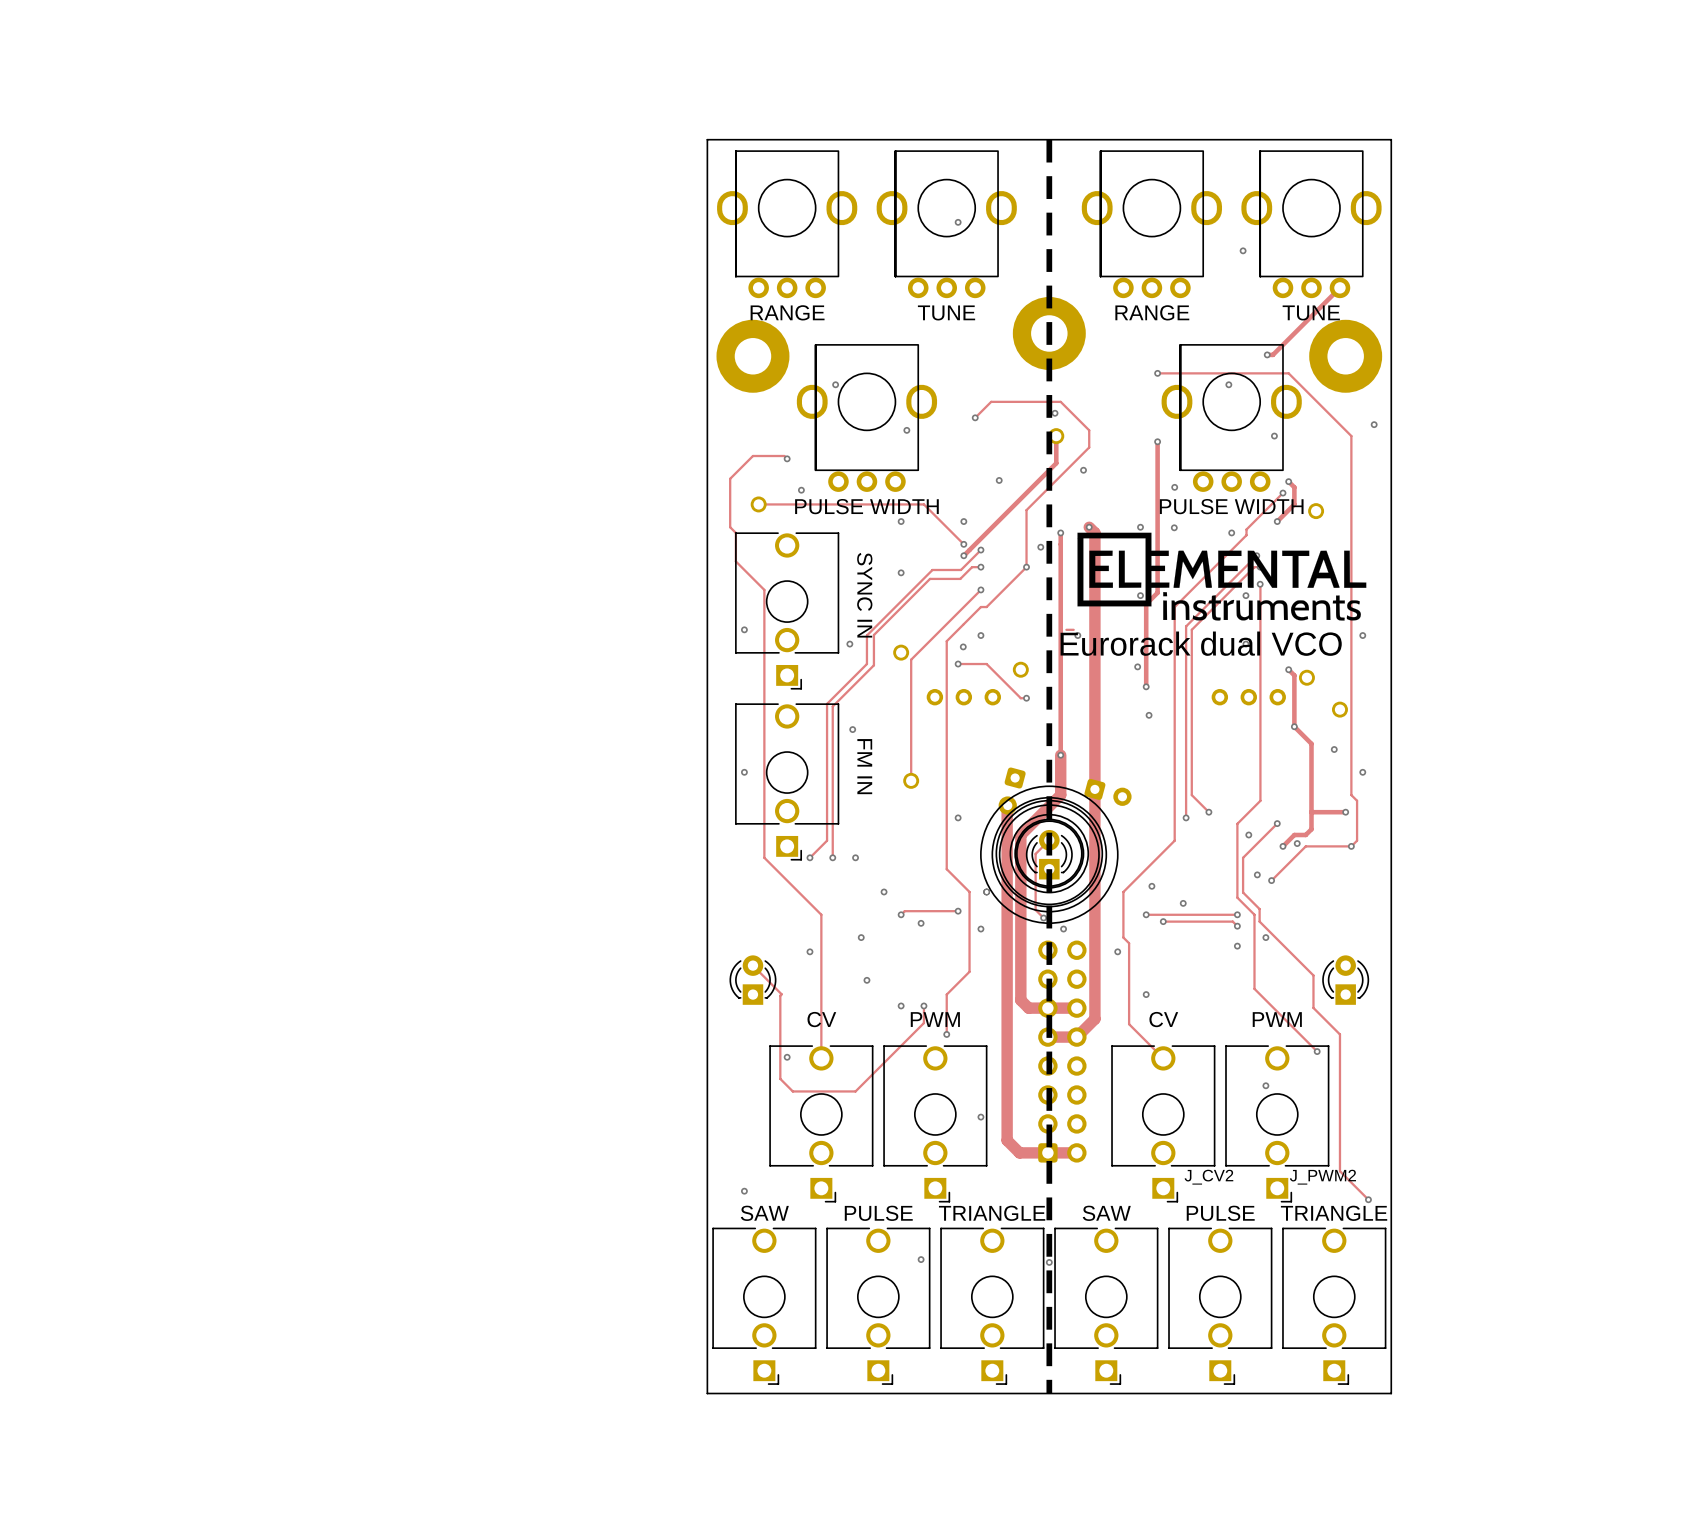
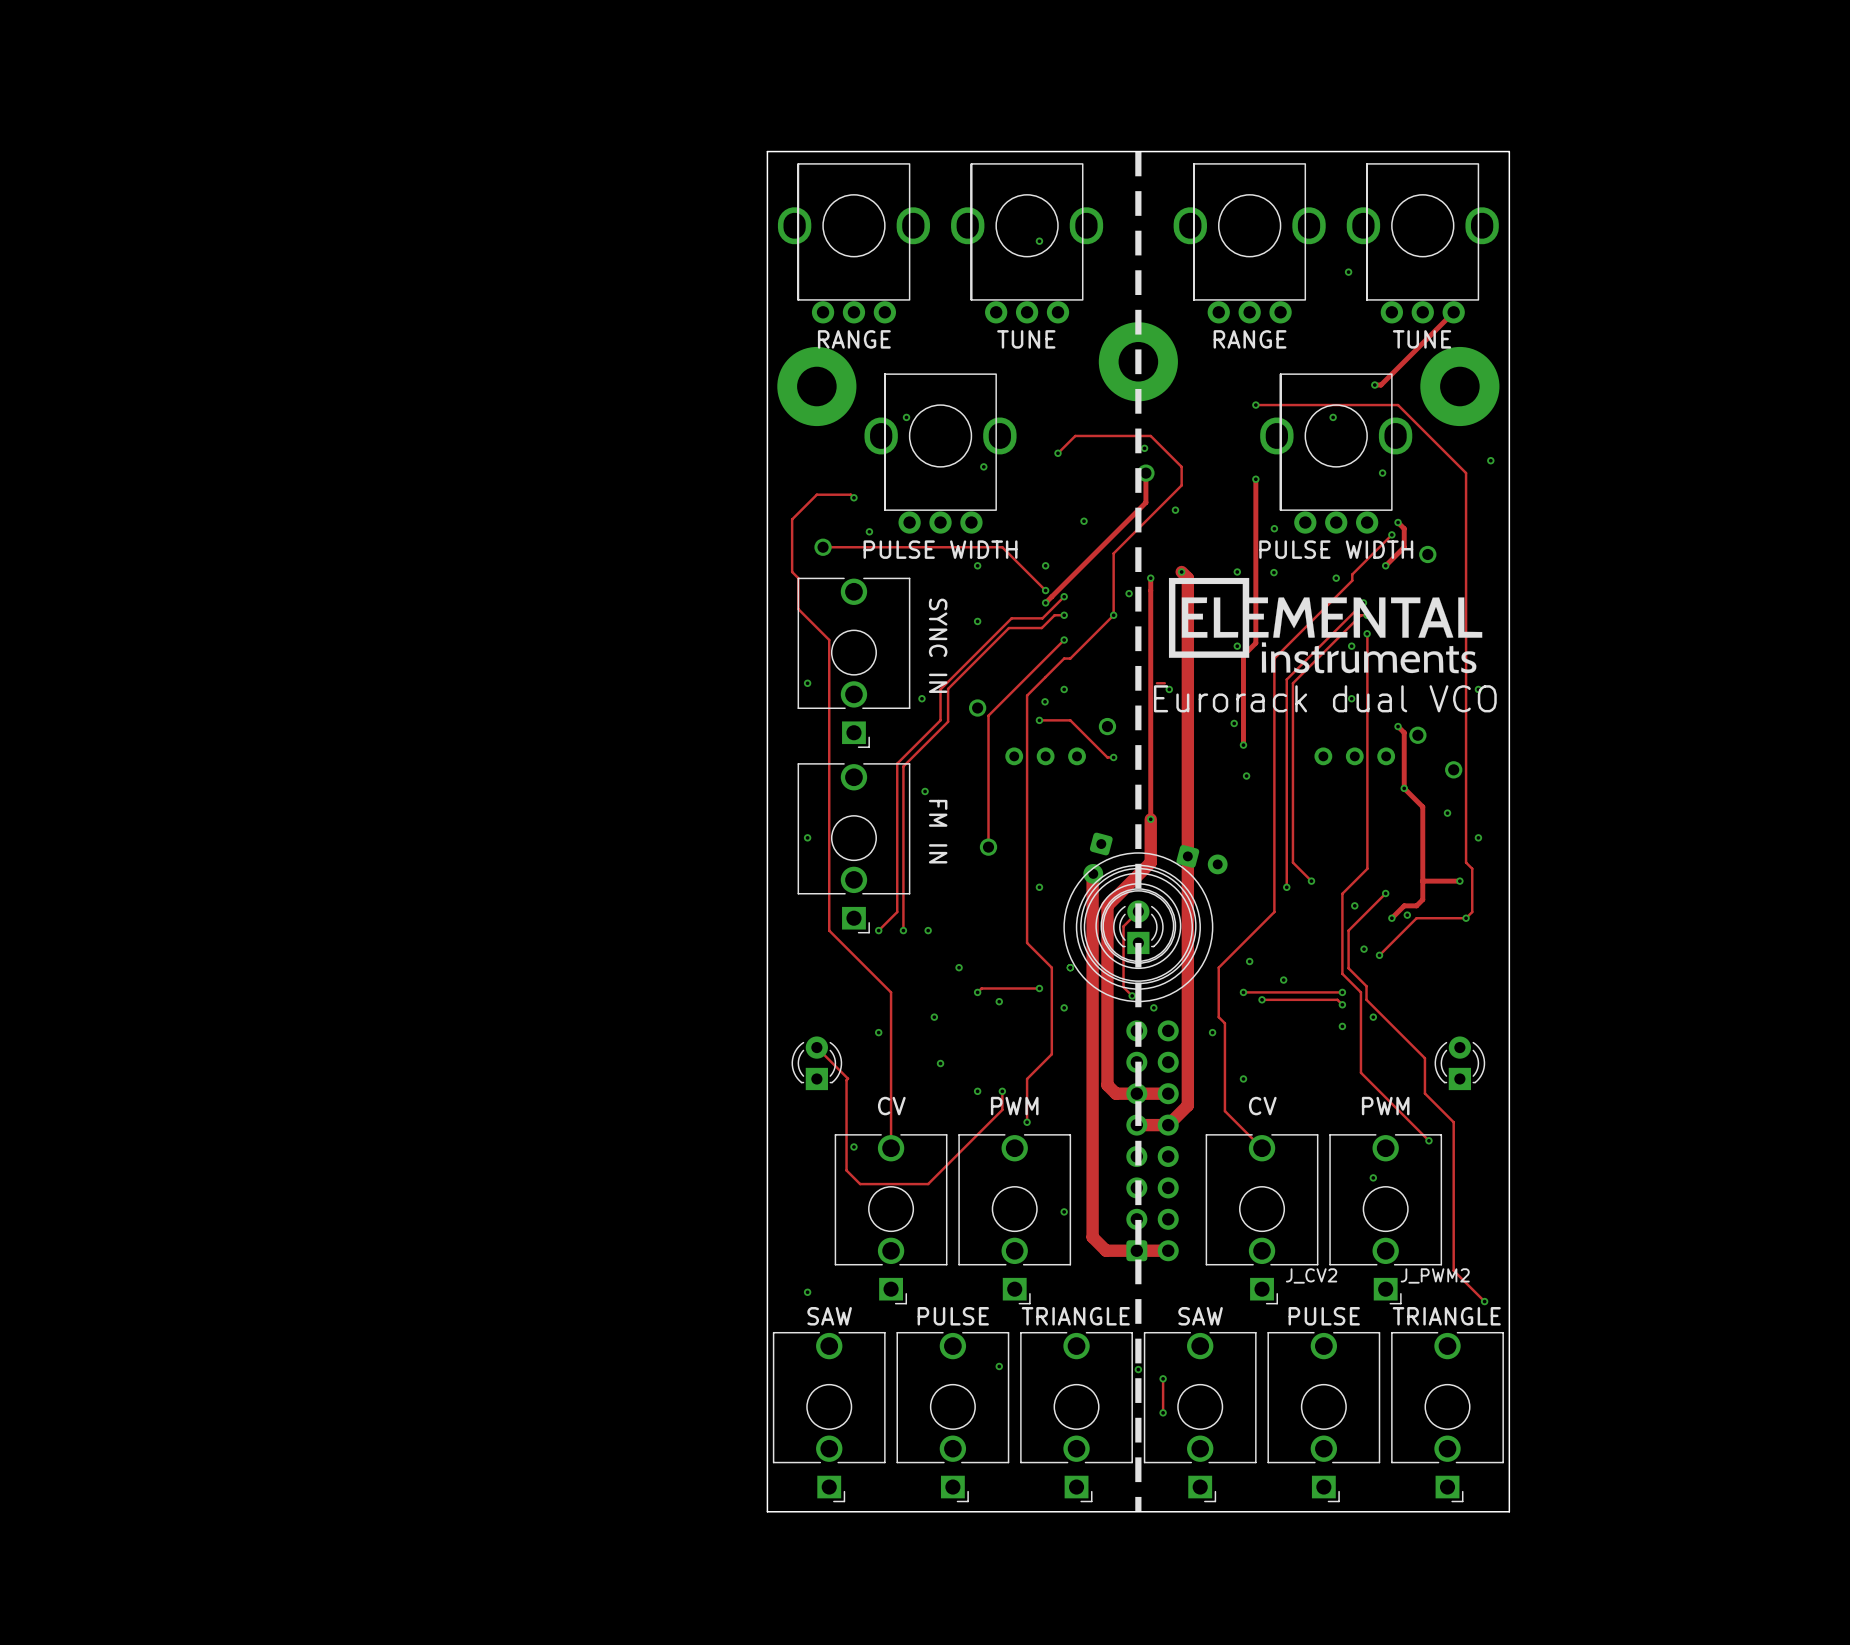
track: none -> (1163, 1378) (1163, 1412)
via: none -> (1163, 1378)
via: none -> (1163, 1412)

